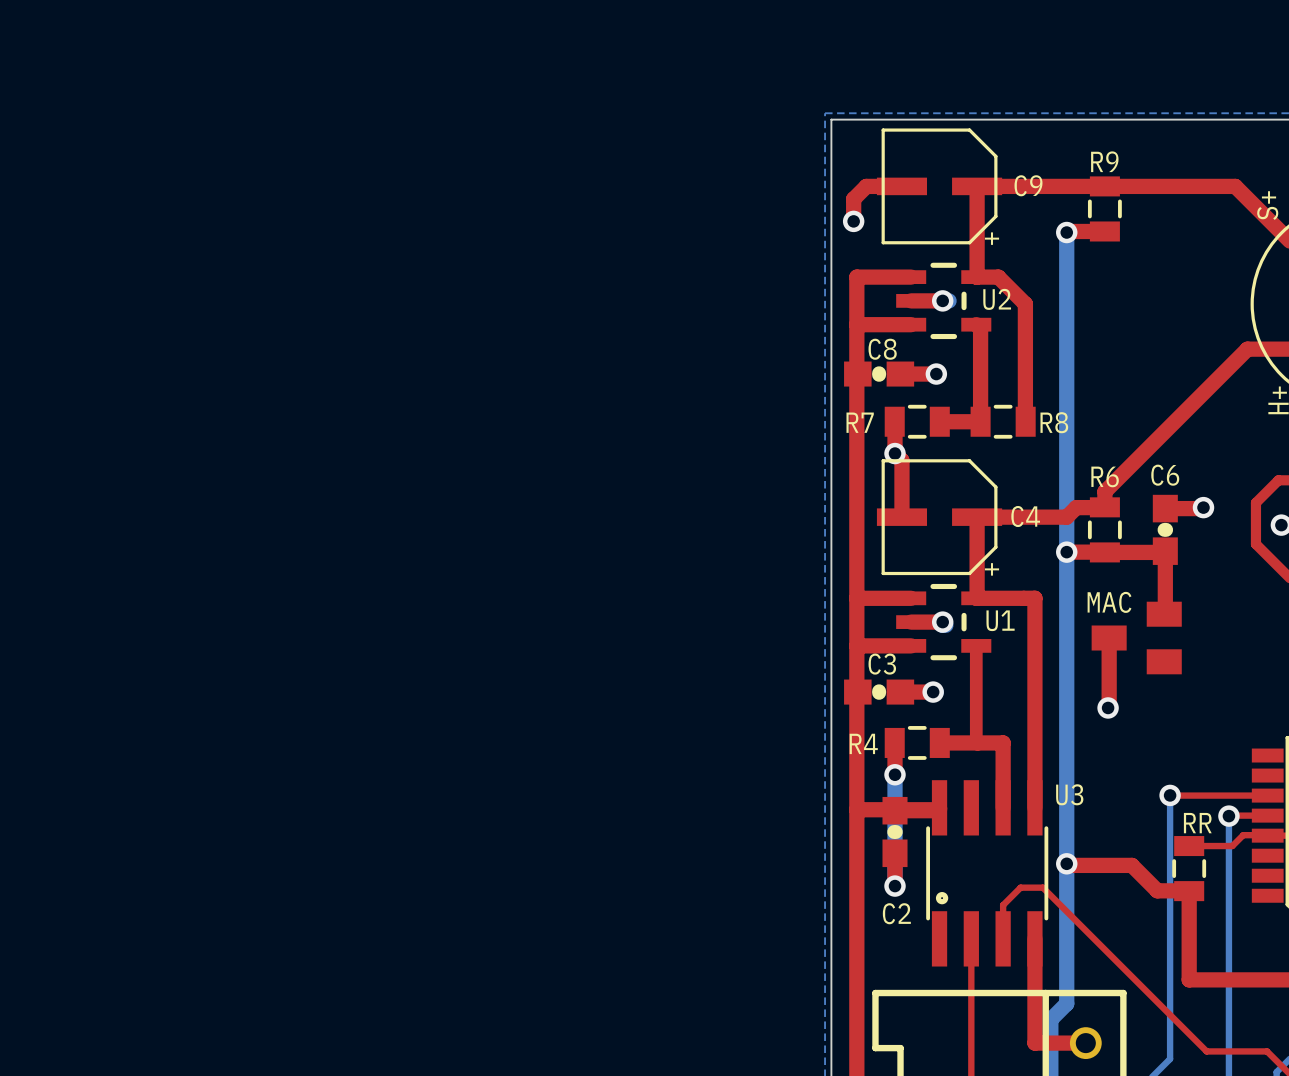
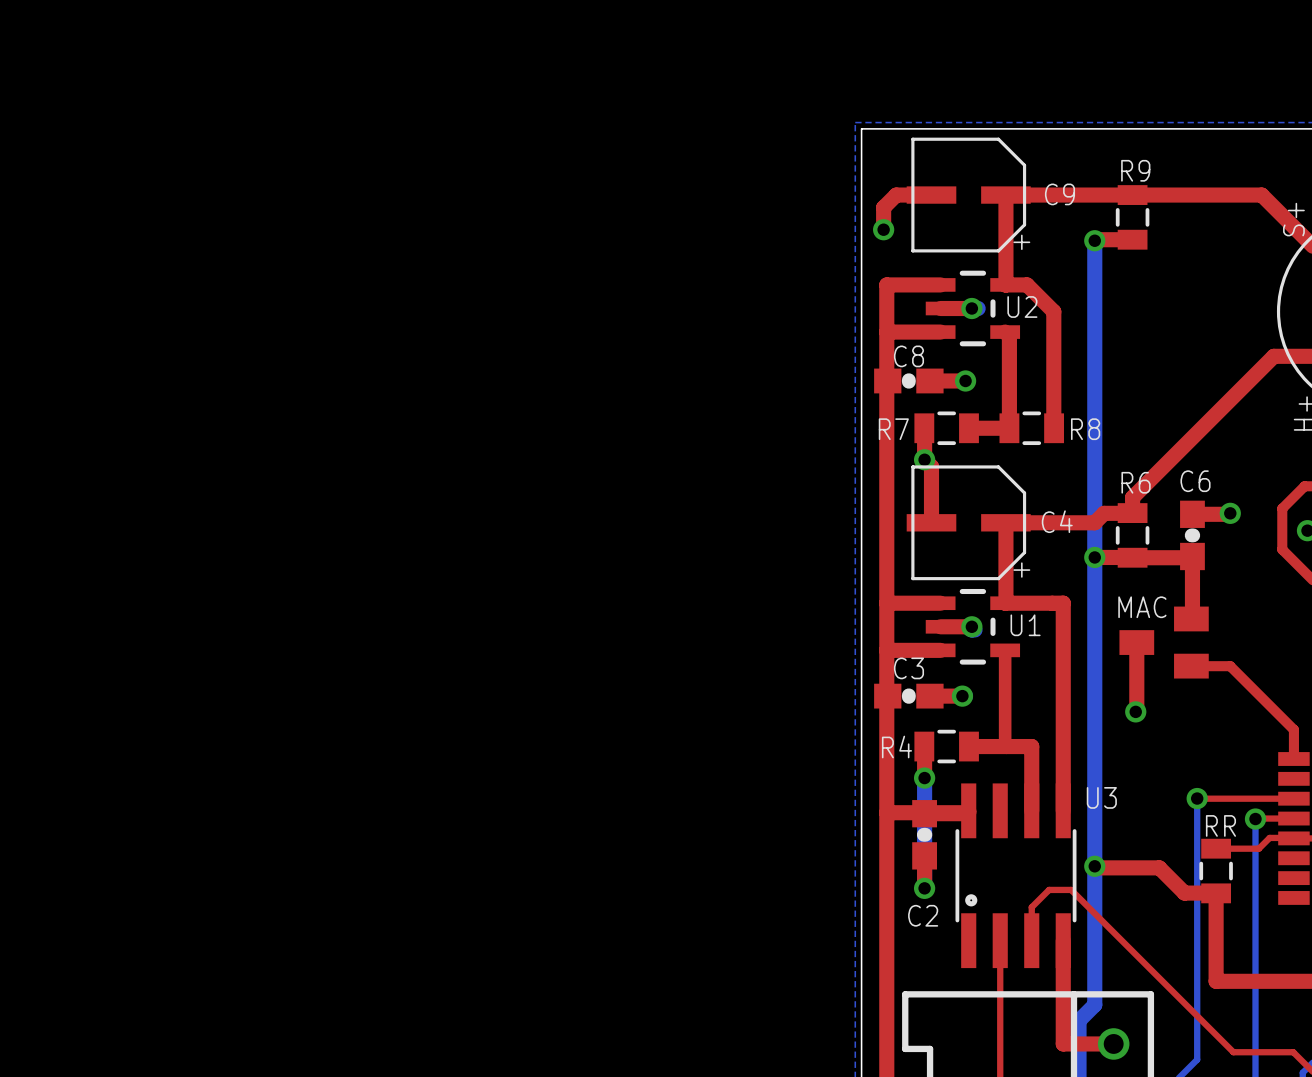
top track: none -> (1191, 666) (1230, 666) (1293, 729) (1293, 759)

